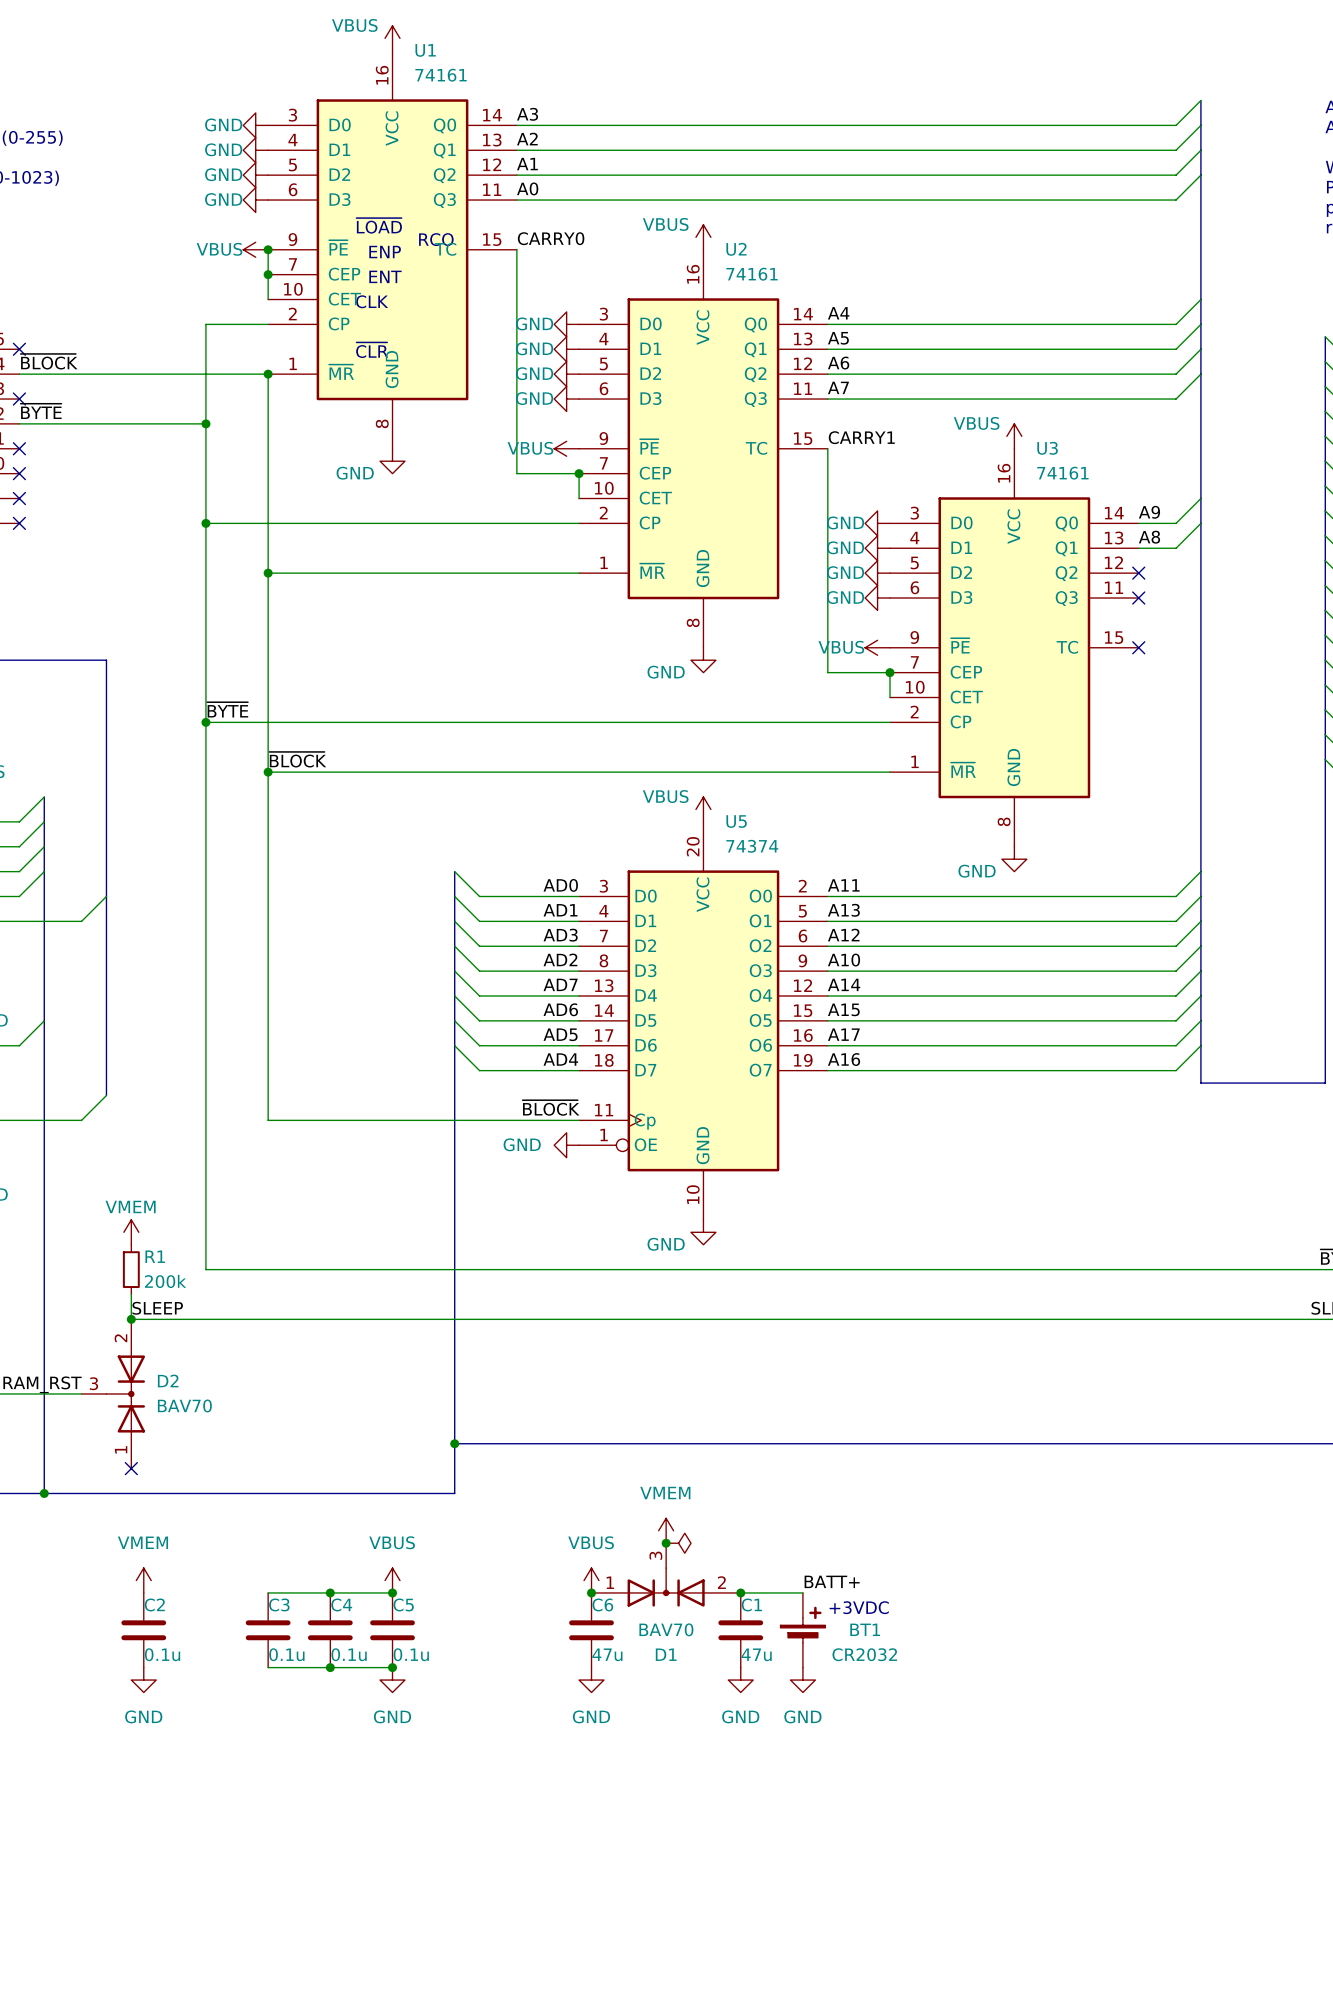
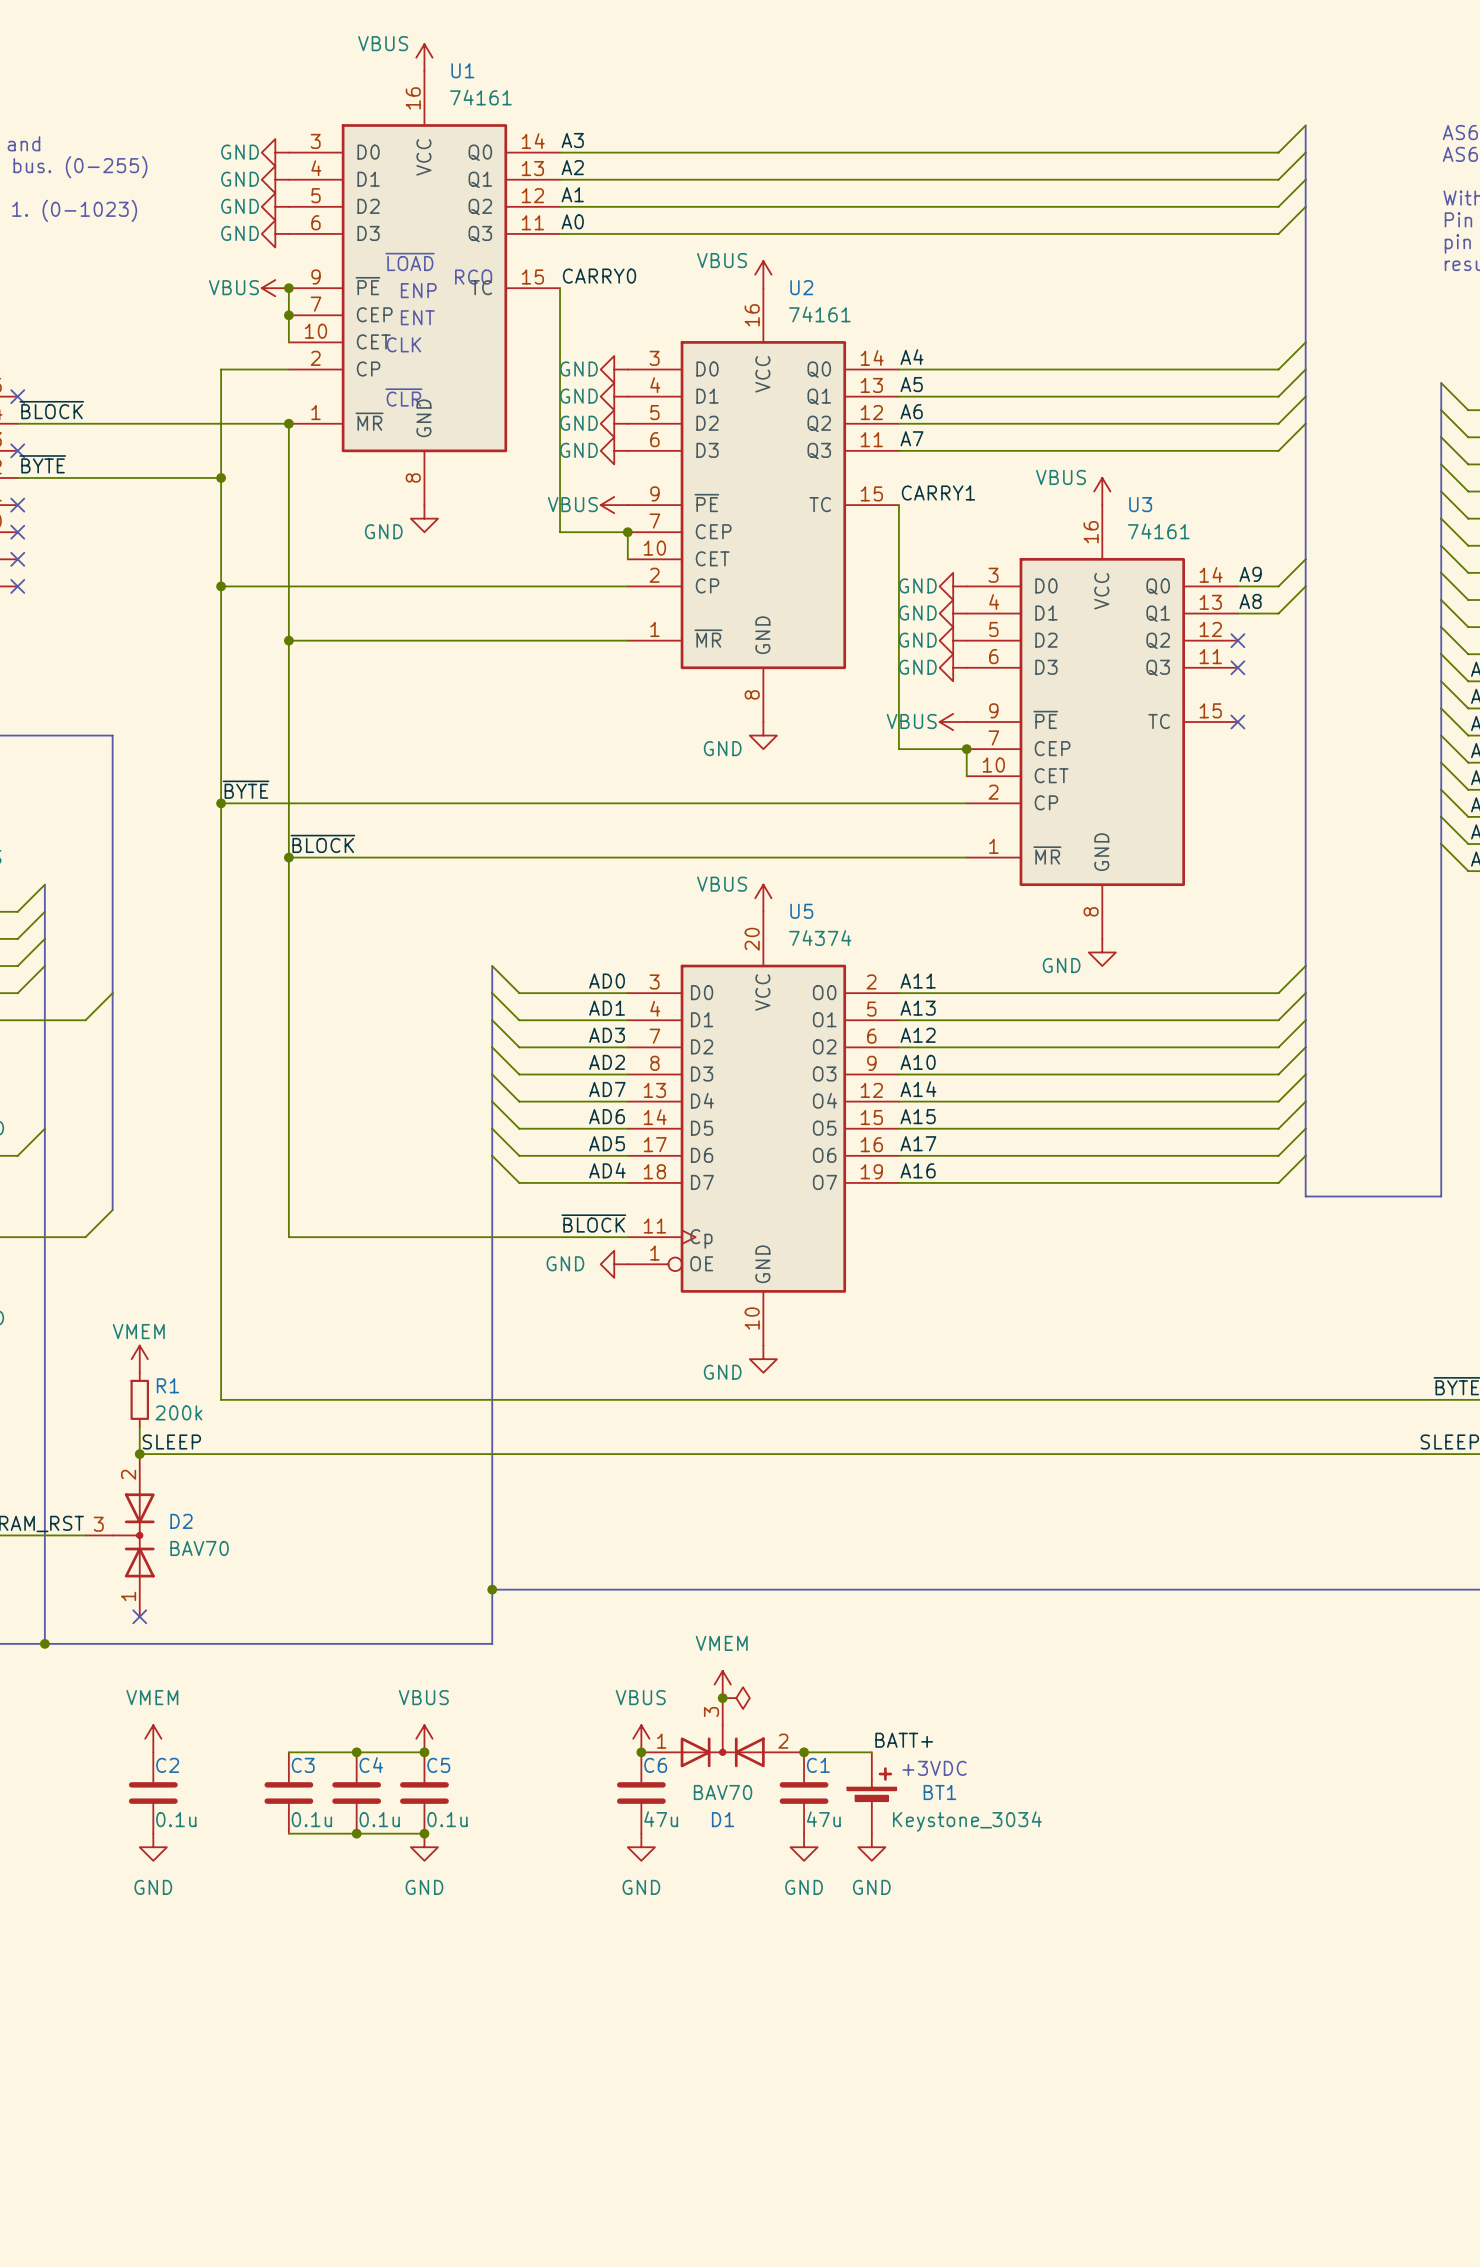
BT1 value: CR2032 (864, 1654) -> Keystone_3034 (967, 1821)

